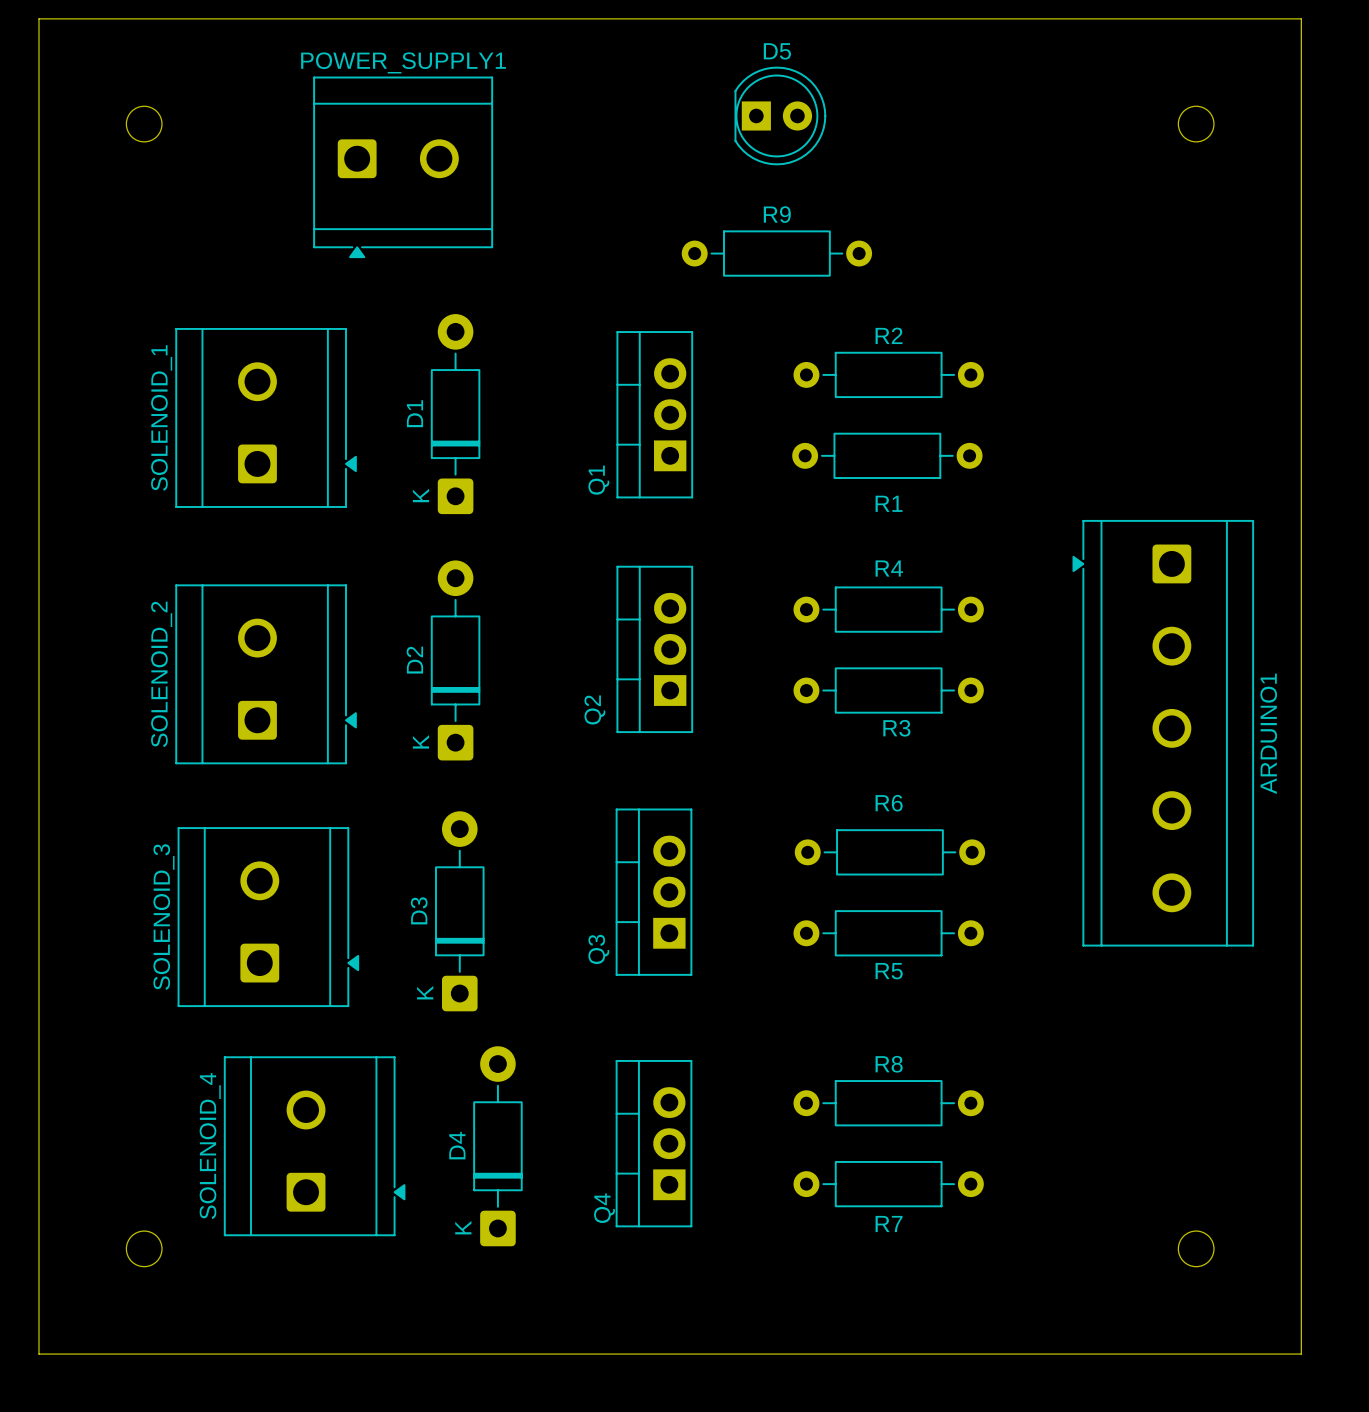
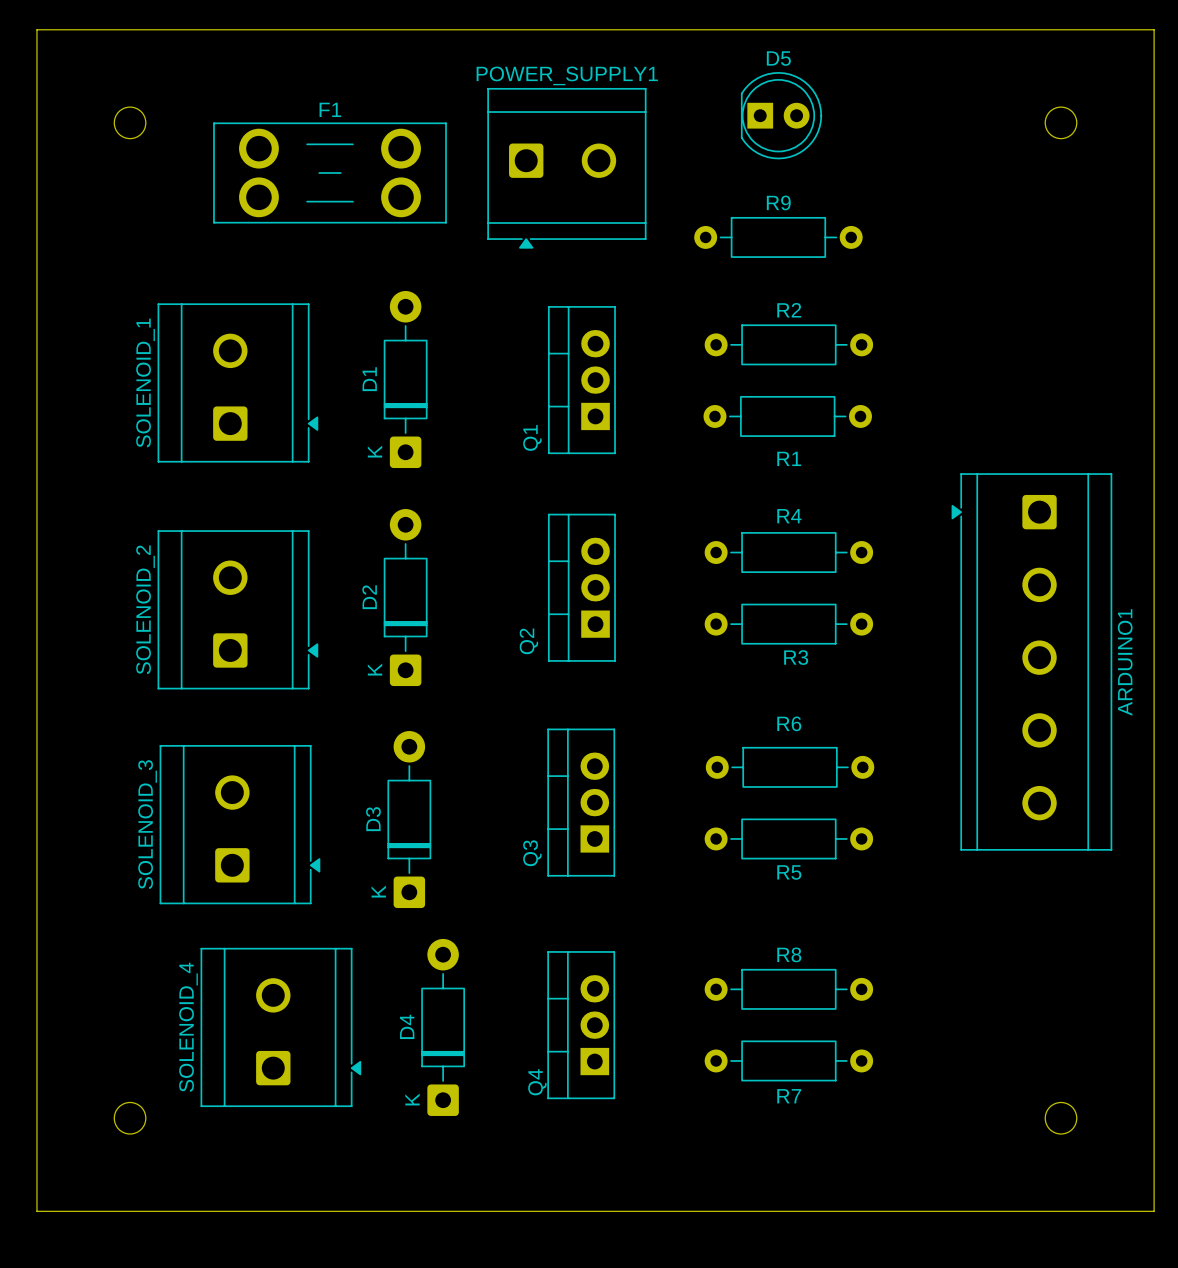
D5 position: (780, 115) -> (781, 115)
POWER_SUPPLY1 position: (403, 167) -> (566, 168)
F1: none -> (330, 172)
R9 position: (776, 253) -> (778, 237)

